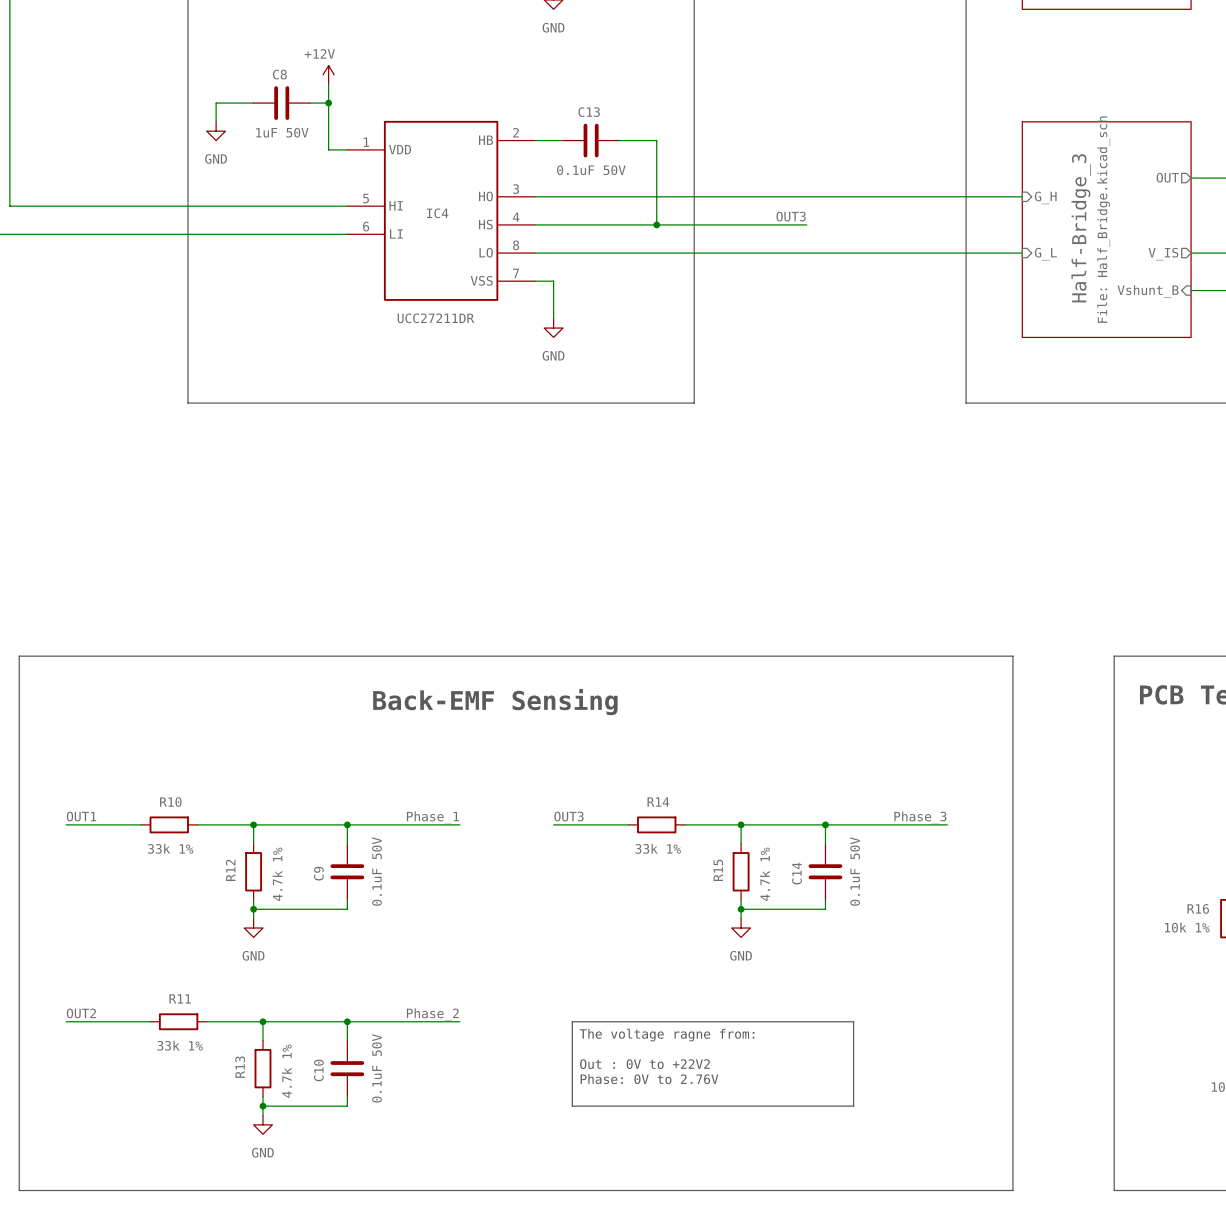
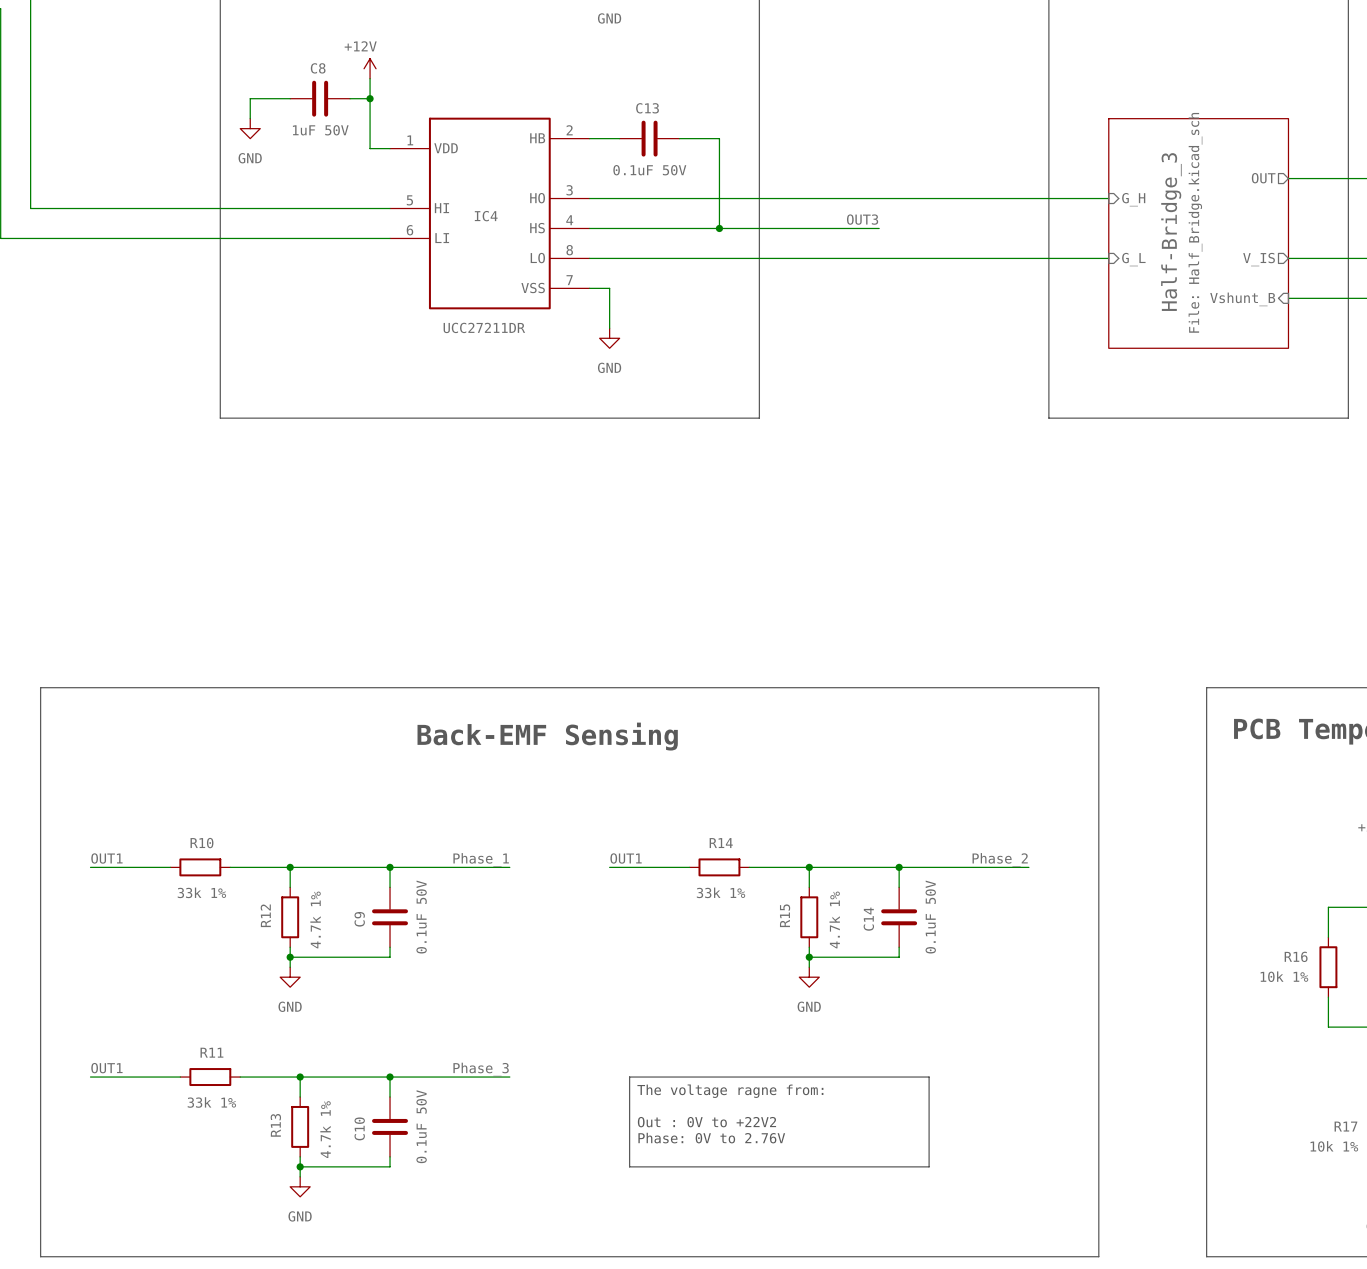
label: OUT3 (568, 816) -> OUT1 (626, 858)
label: Phase_3 (920, 817) -> Phase_2 (1000, 859)
label: OUT2 (81, 1013) -> OUT1 (106, 1068)
label: Phase_2 (432, 1014) -> Phase_3 (481, 1069)

